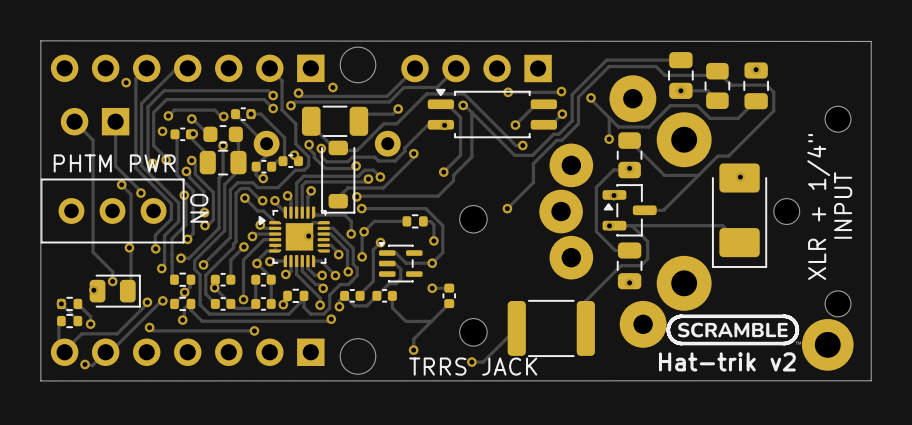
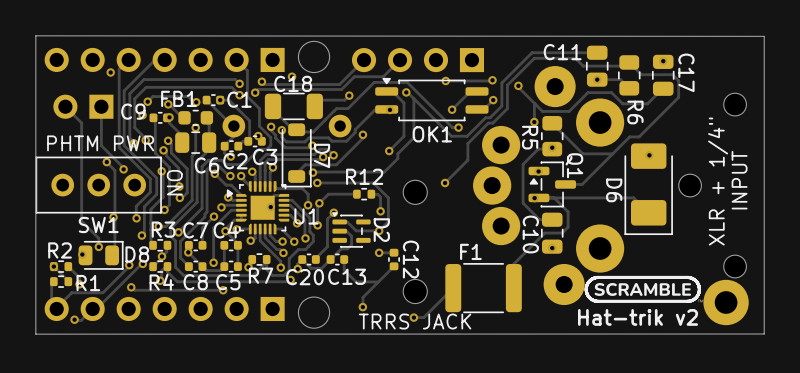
C11 name: none -> C11 (562, 52)
C17 name: none -> C17 (686, 72)
C18 name: none -> C18 (293, 83)
FB1 name: none -> FB1 (179, 98)
C1 name: none -> C1 (239, 99)
C9 name: none -> C9 (133, 111)
R6 name: none -> R6 (635, 112)
OK1 name: none -> OK1 (432, 134)
R5 name: none -> R5 (530, 137)
D7 name: none -> D7 (322, 155)
C3 name: none -> C3 (265, 156)
C2 name: none -> C2 (235, 161)
C6 name: none -> C6 (207, 165)
Q1 name: none -> Q1 (574, 165)
R12 name: none -> R12 (364, 176)
D6 name: none -> D6 (614, 190)
U1 name: none -> U1 (306, 216)
SW1 name: none -> SW1 (98, 224)
R3 name: none -> R3 (163, 229)
C7 name: none -> C7 (195, 230)
C4 name: none -> C4 (226, 230)
D2 name: none -> D2 (381, 230)
C10 name: none -> C10 (530, 234)
R2 name: none -> R2 (60, 250)
F1 name: none -> F1 (470, 251)
D8 name: none -> D8 (137, 254)
C12 name: none -> C12 (411, 259)
R7 name: none -> R7 (261, 275)
C20 name: none -> C20 (305, 277)
C13 name: none -> C13 (347, 276)
R4 name: none -> R4 (161, 282)
C8 name: none -> C8 (195, 282)
C5 name: none -> C5 (228, 282)
R1 name: none -> R1 (88, 283)

